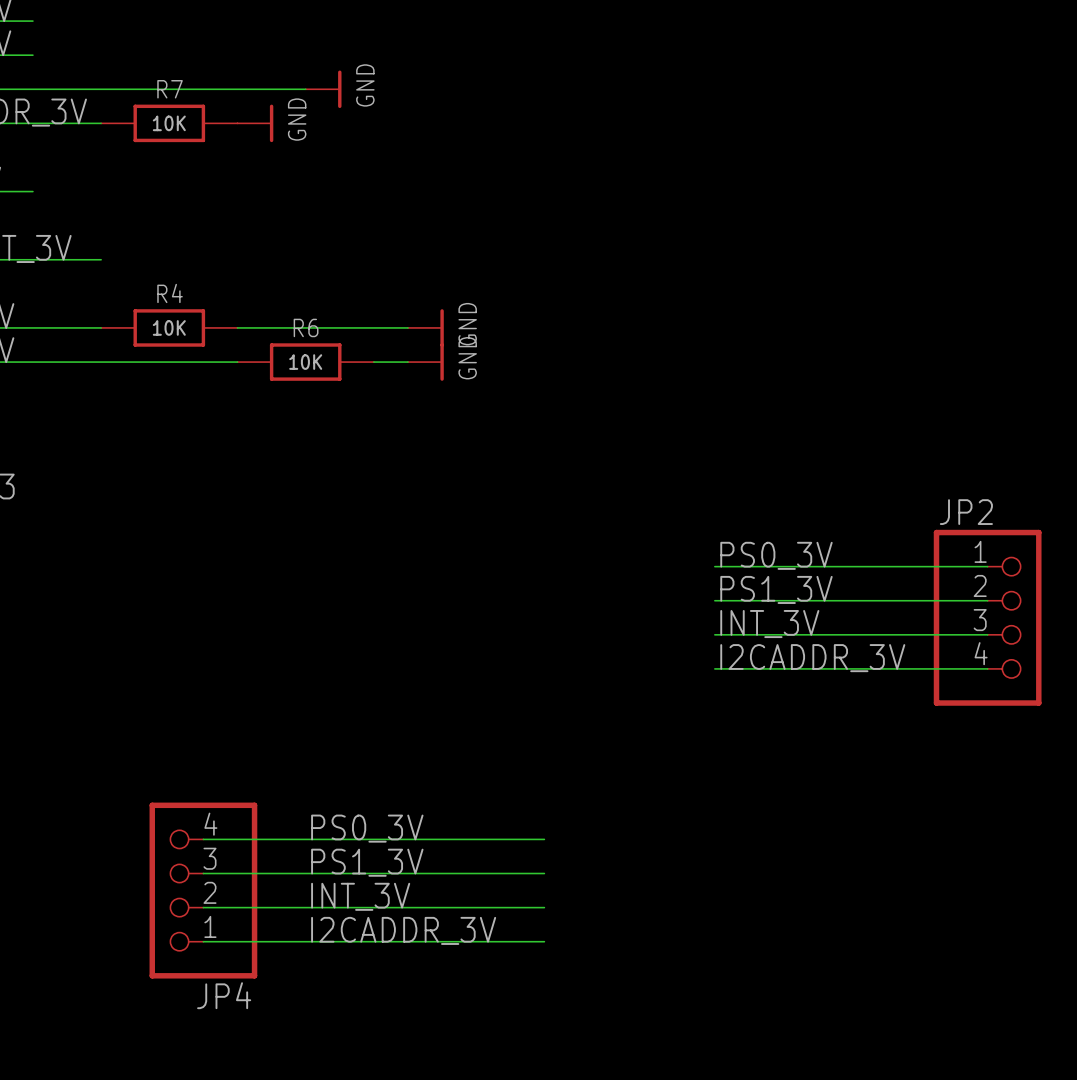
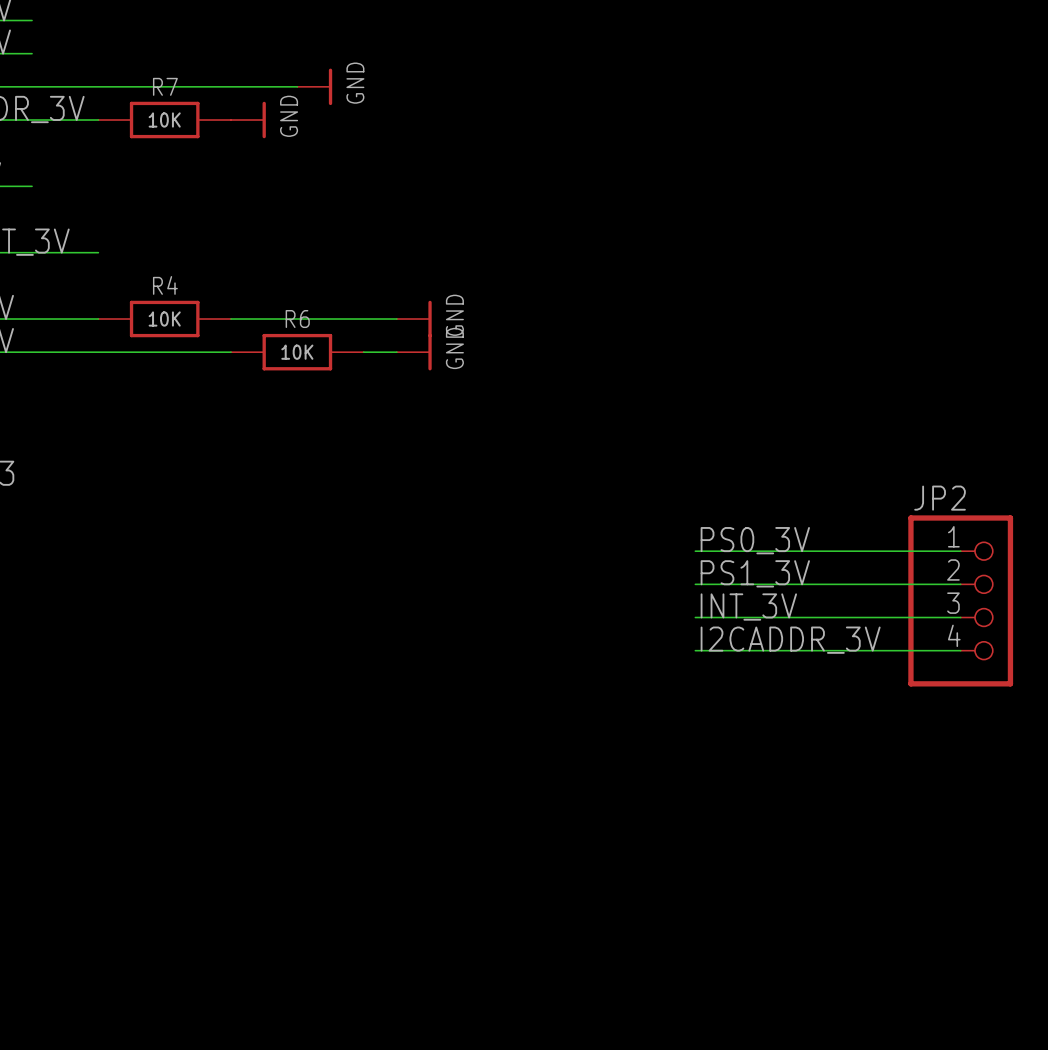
label: PS0_3V (367, 828) -> none
wire: (203, 839) (544, 839) -> none
label: PS1_3V (367, 862) -> none
wire: (203, 873) (544, 873) -> none
JP4: (203, 890) -> none
label: INT_3V (360, 896) -> none
wire: (203, 907) (544, 907) -> none
label: I2CADDR_3V (403, 930) -> none
wire: (203, 941) (544, 941) -> none

